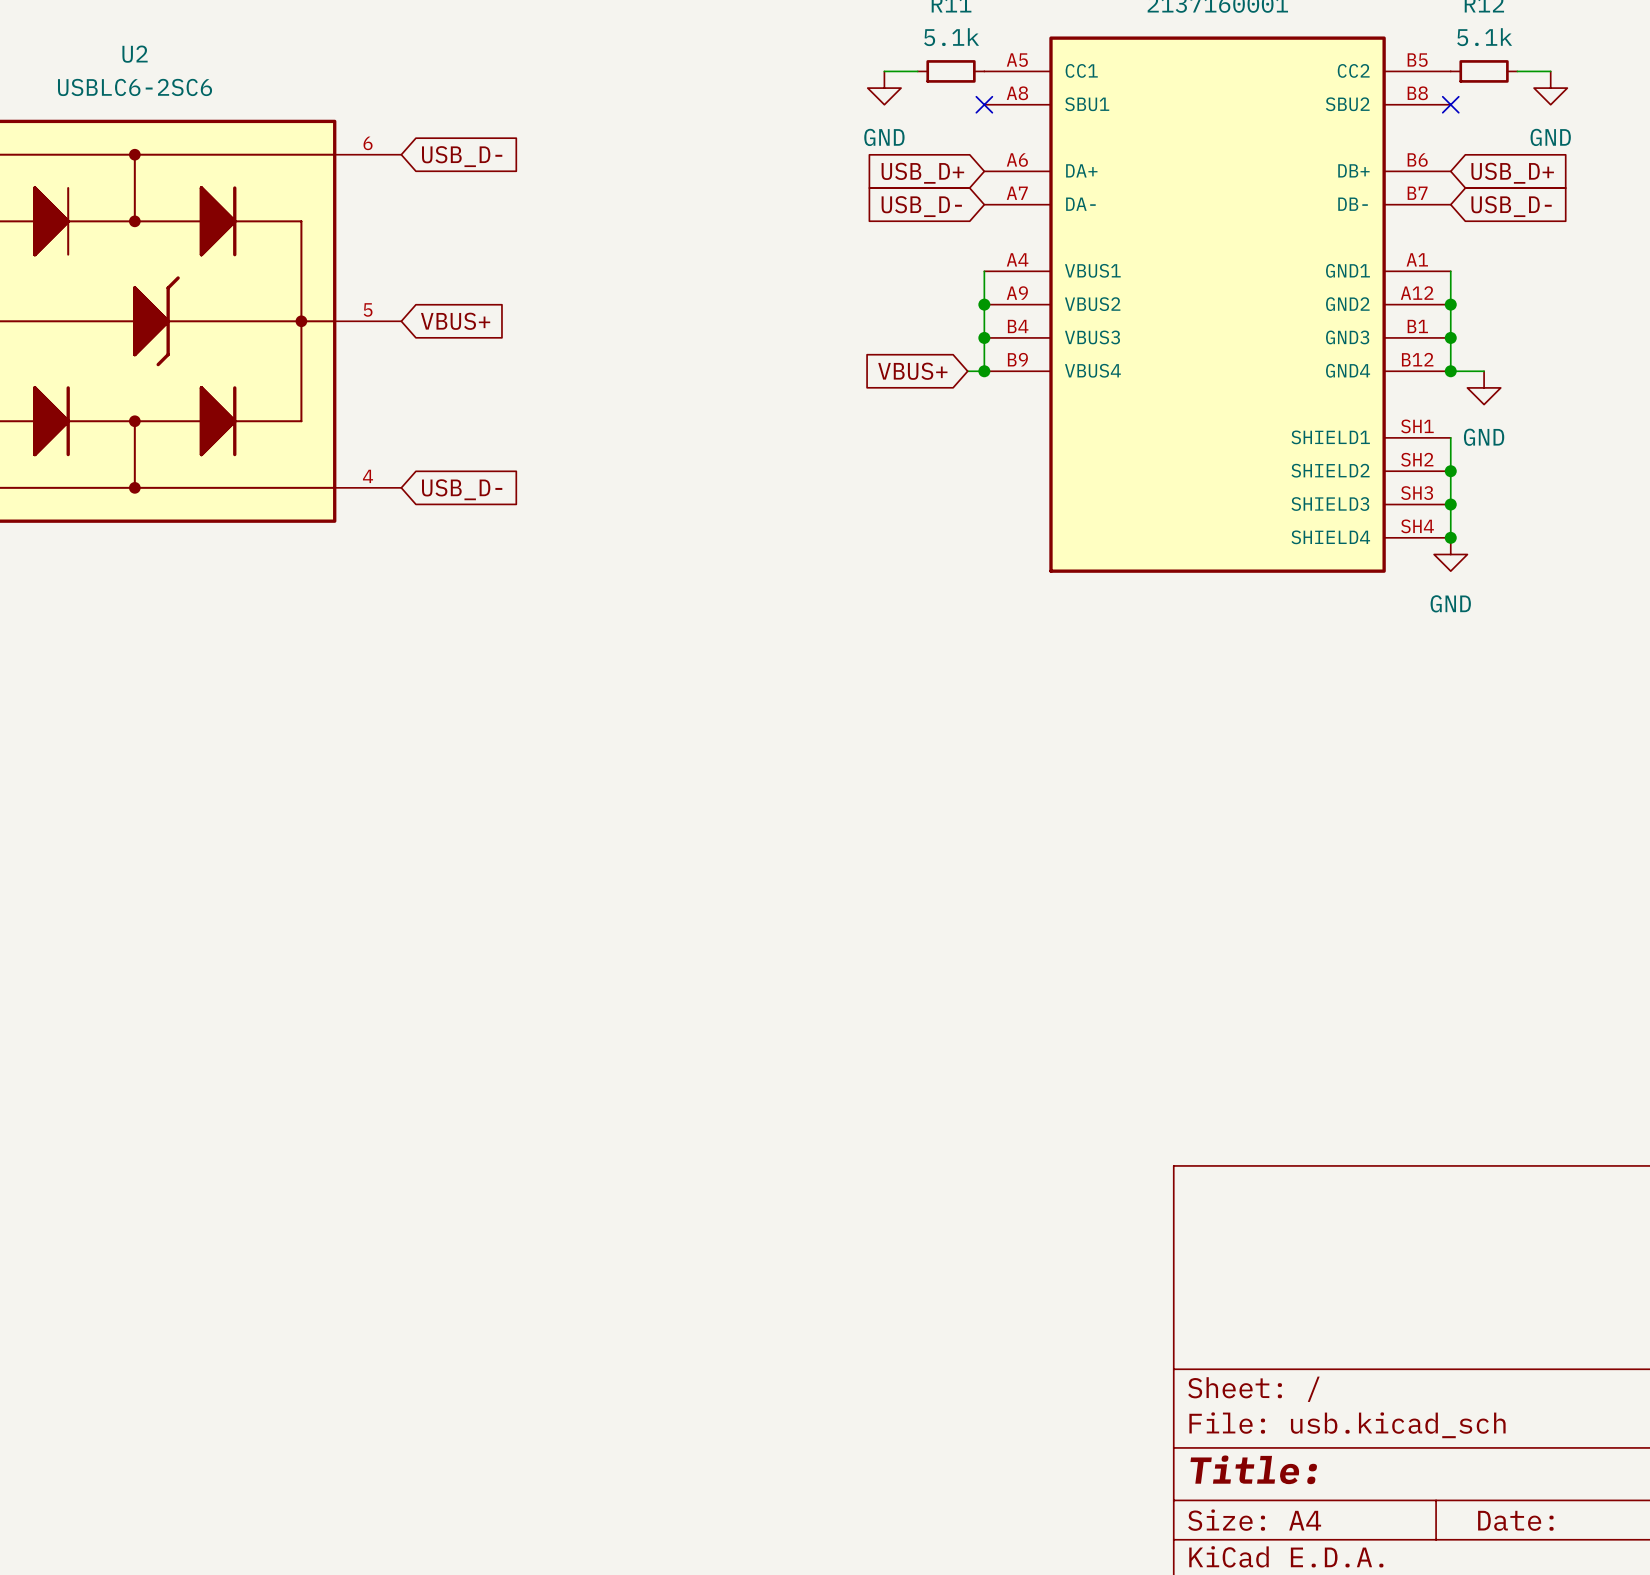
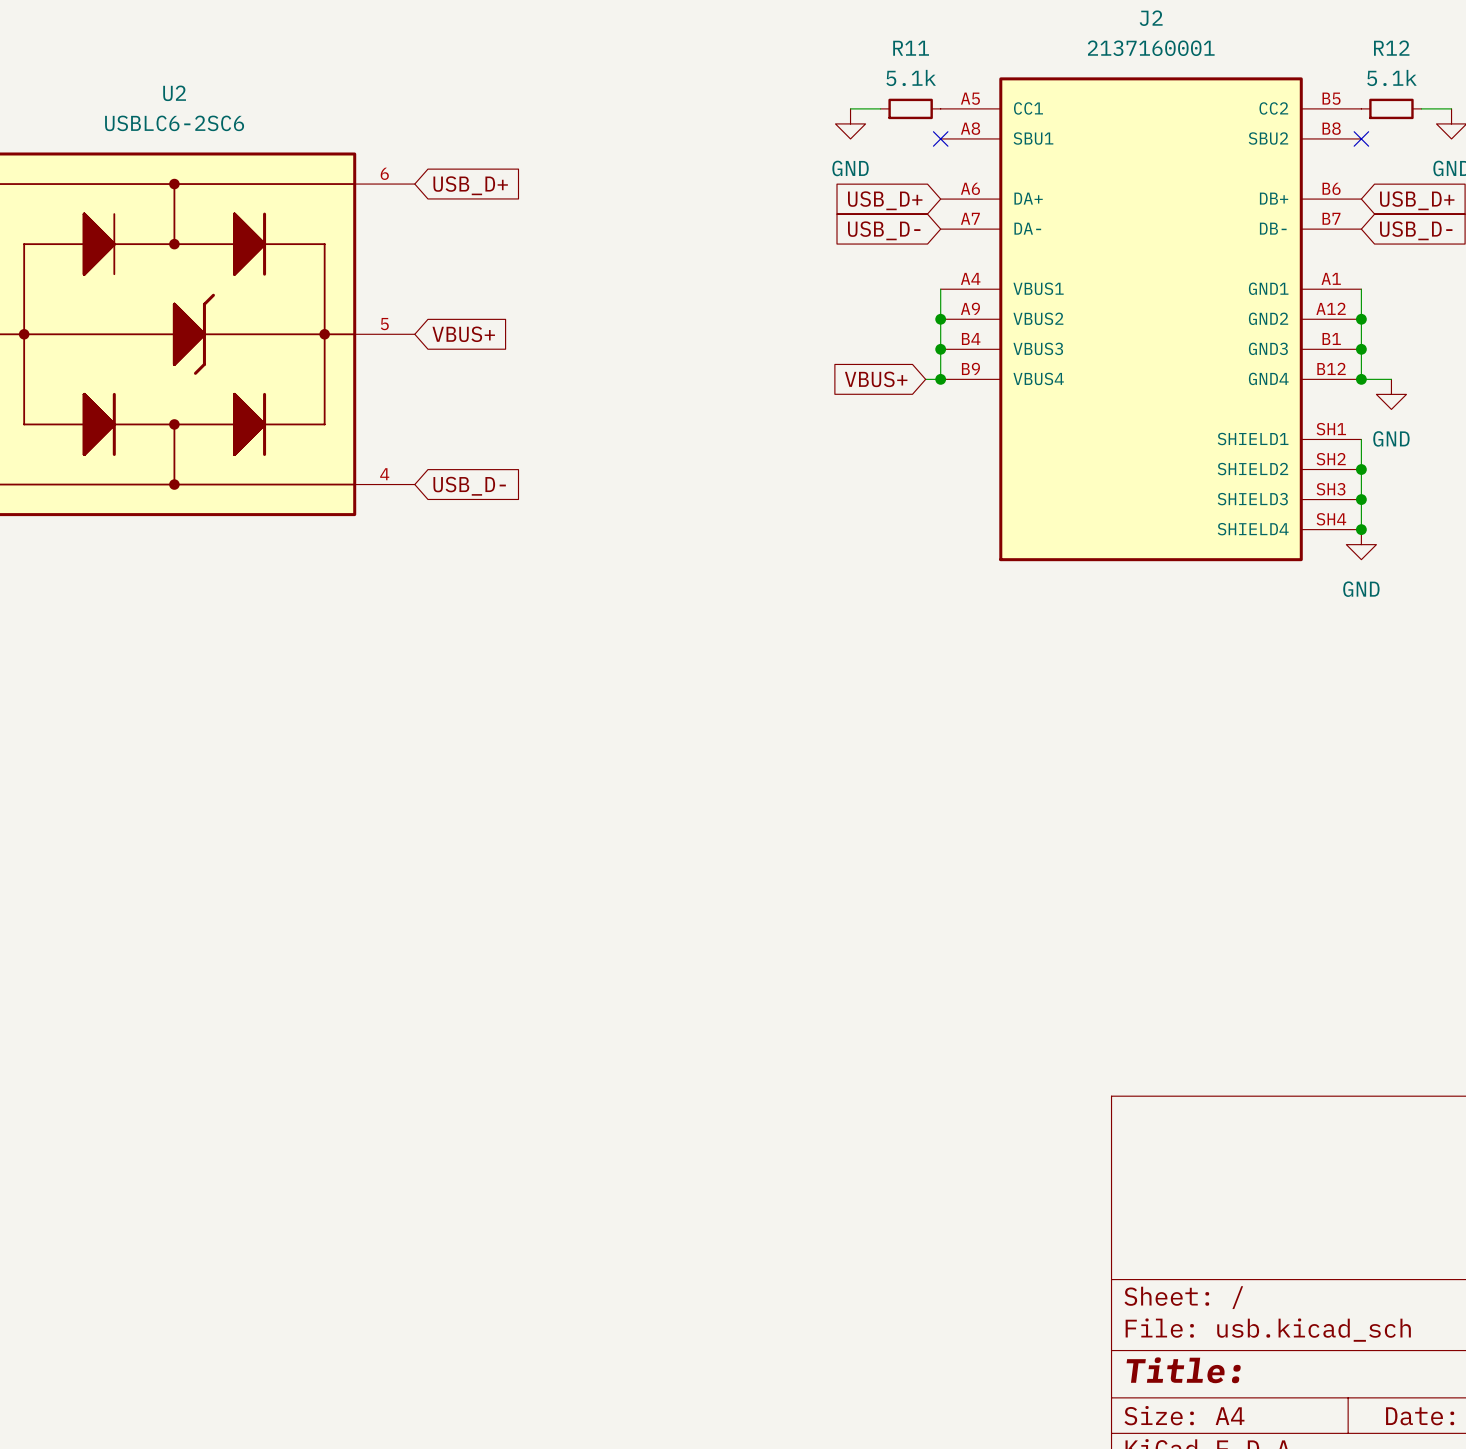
global label: USB_D- (462, 156) -> USB_D+ (470, 185)

